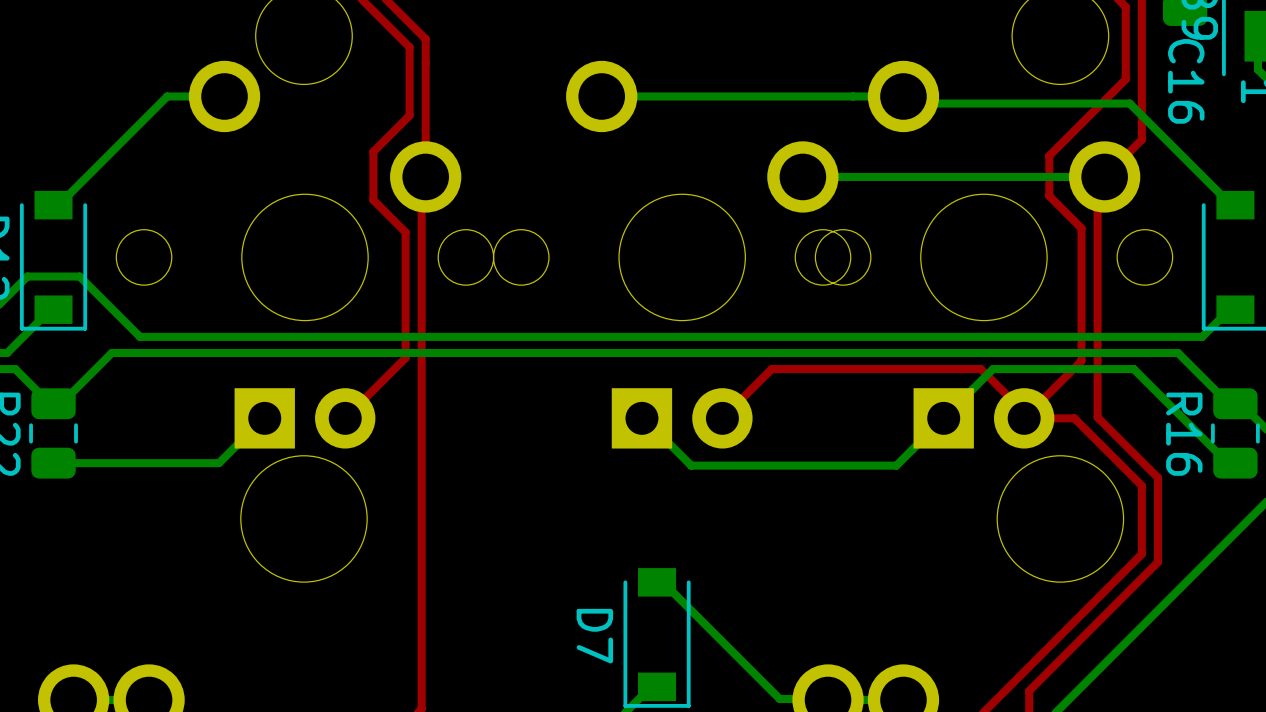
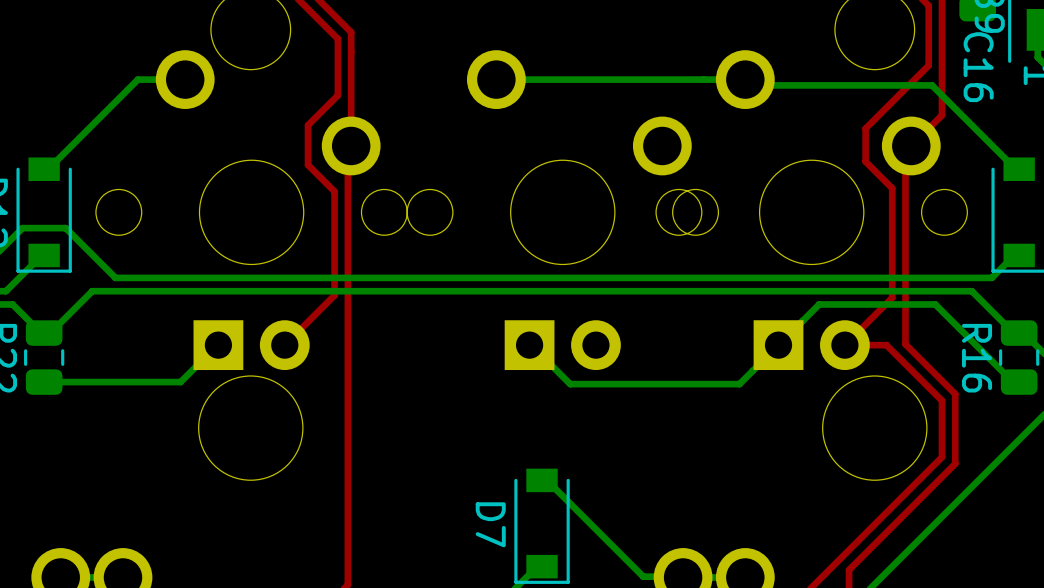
bottom track: (1104, 176) (802, 176) -> none
top track: (1024, 418) (1024, 412) (980, 369) (771, 369) (722, 418) -> none

